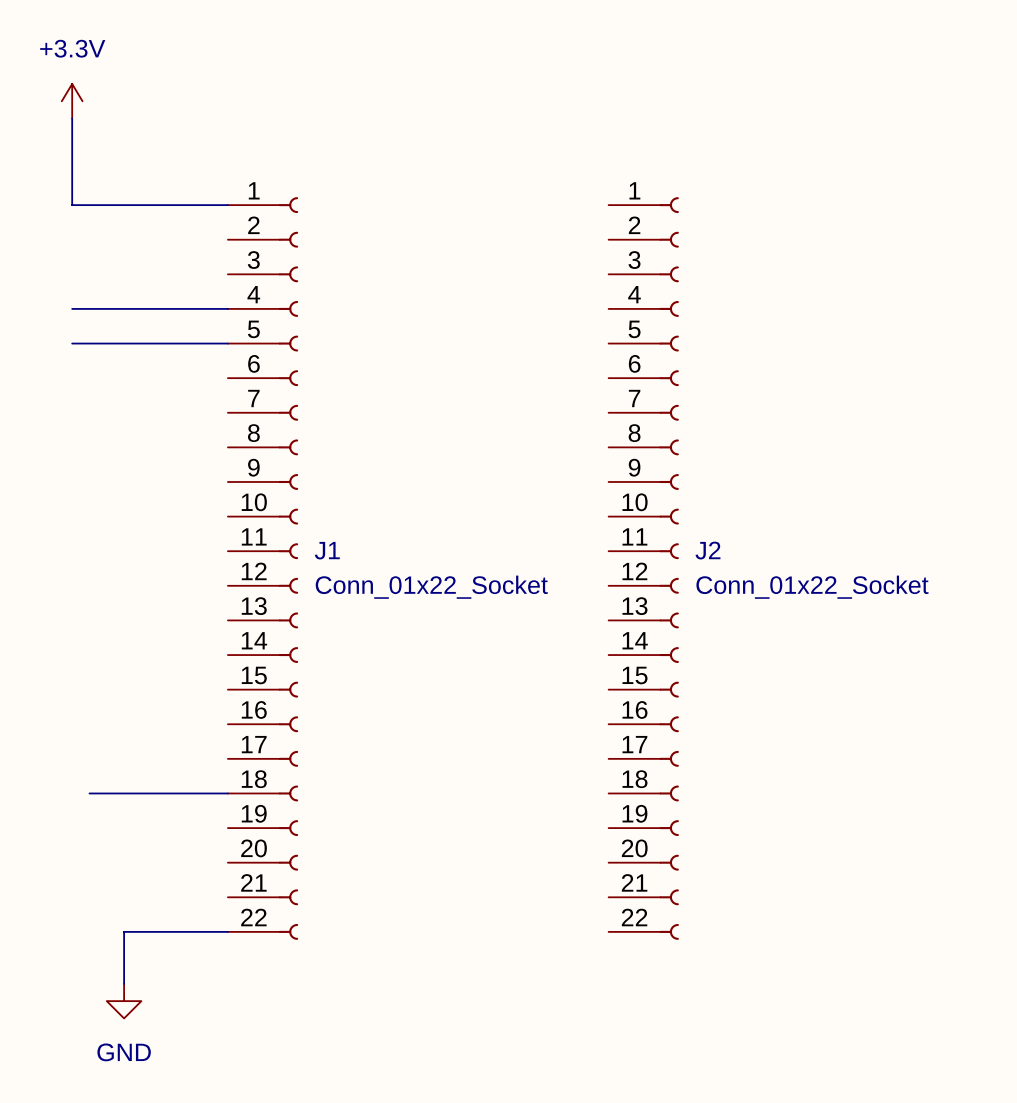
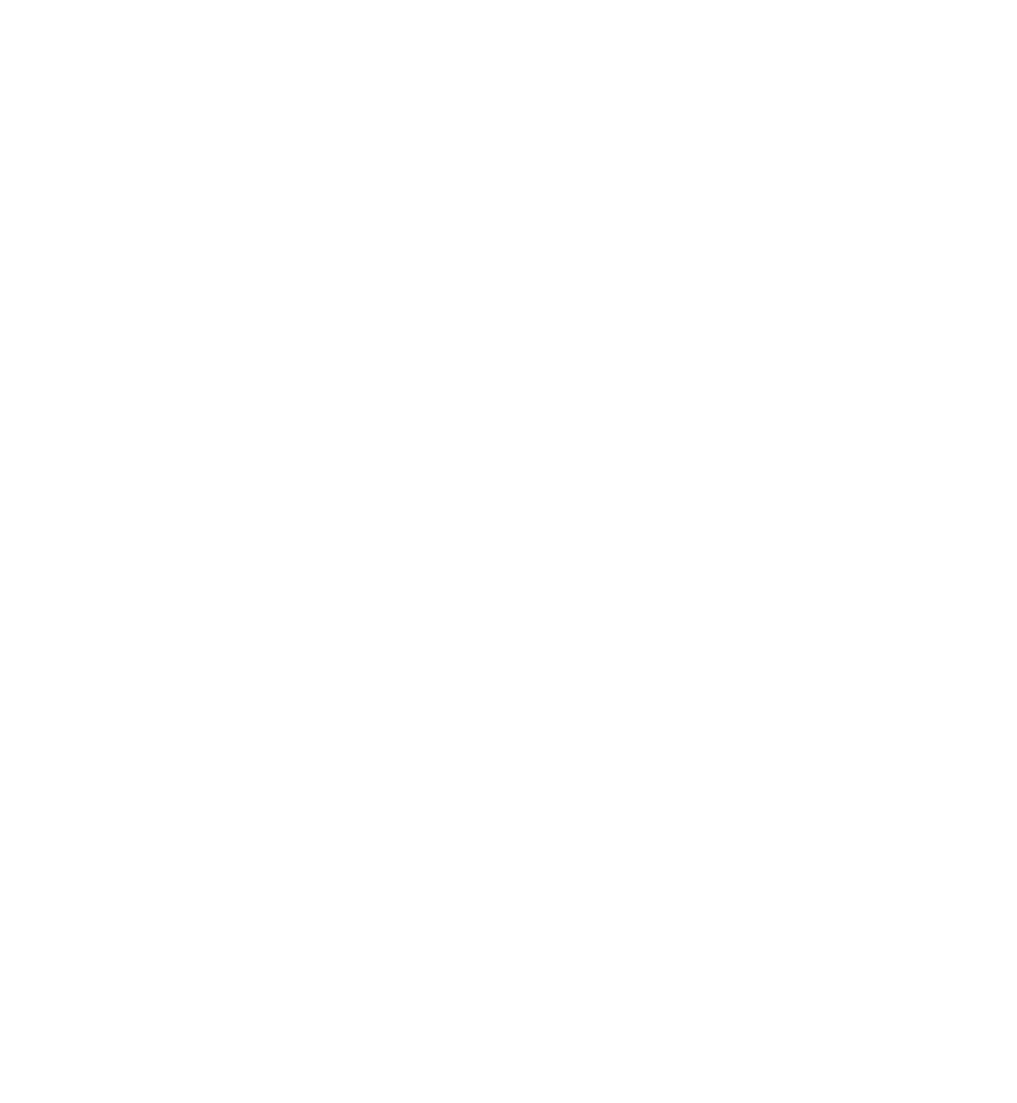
power symbol: +3.3V (72, 101) -> none
wire: (72, 118) (72, 205) (227, 205) -> none
wire: (72, 308) (227, 308) -> none
wire: (72, 343) (227, 343) -> none
J1: Conn_01x22_Socket (263, 568) -> none
J2: Conn_01x22_Socket (643, 568) -> none
wire: (89, 793) (227, 793) -> none
wire: (227, 931) (124, 931) (124, 983) -> none
power symbol: GND (124, 1001) -> none

